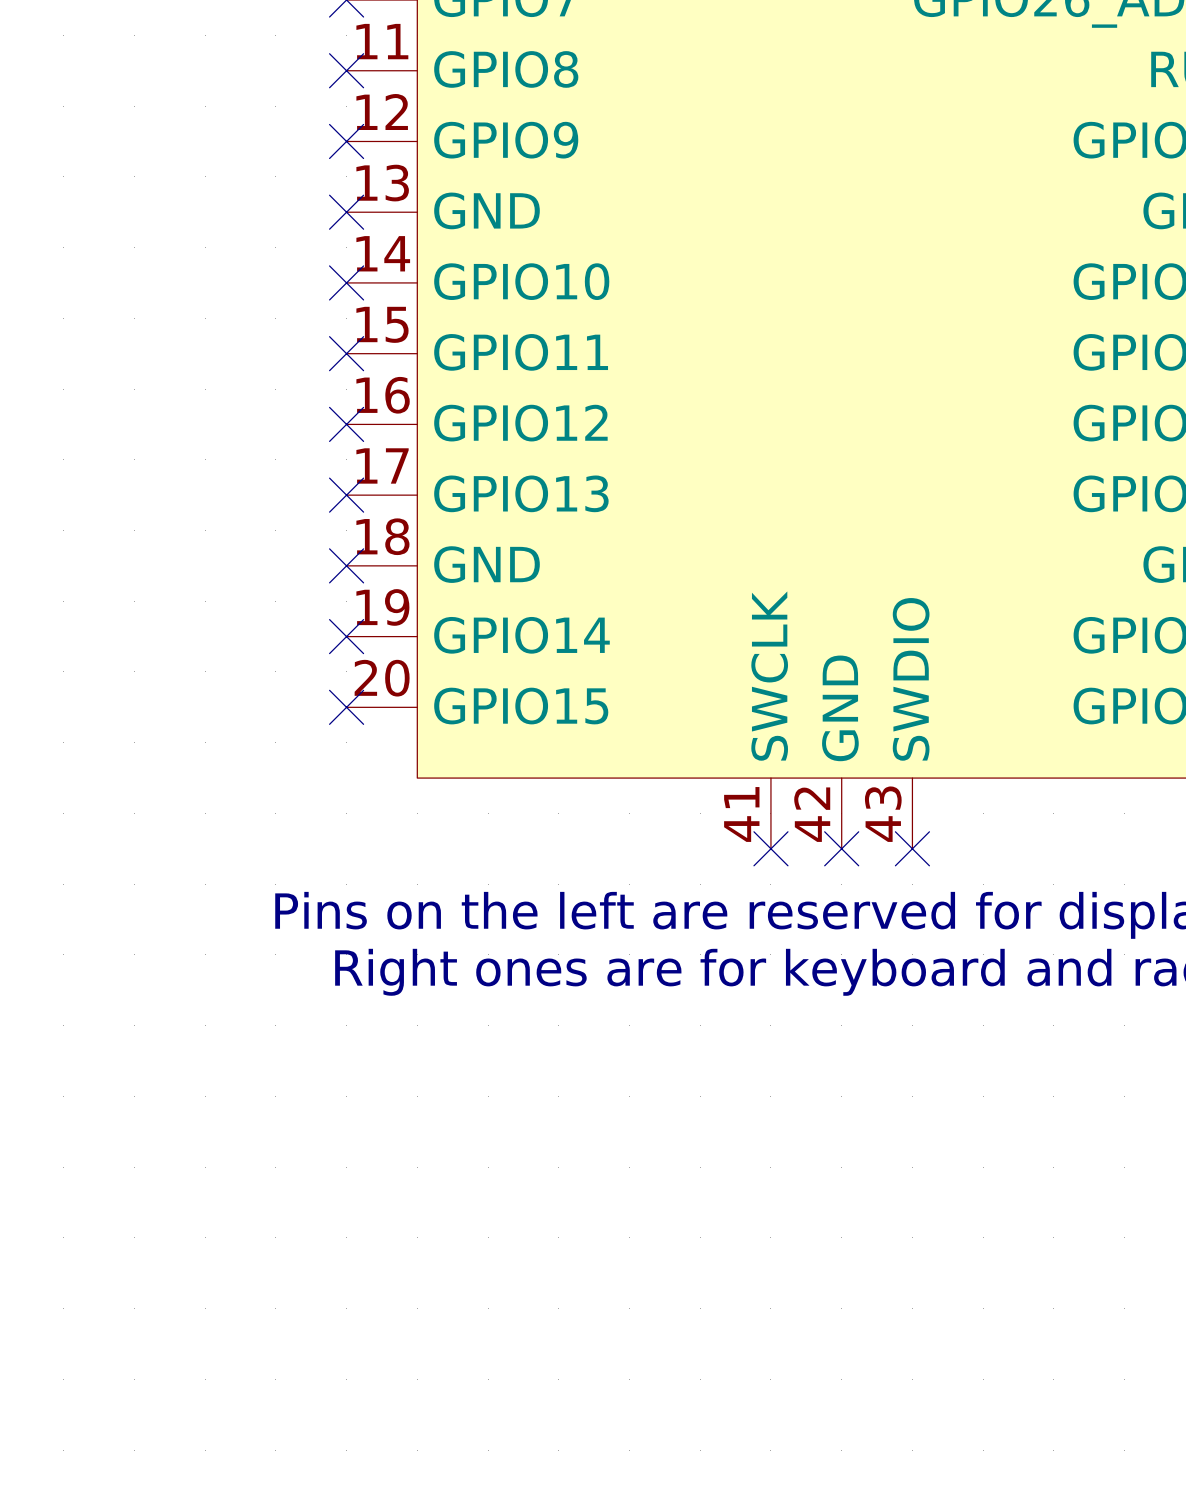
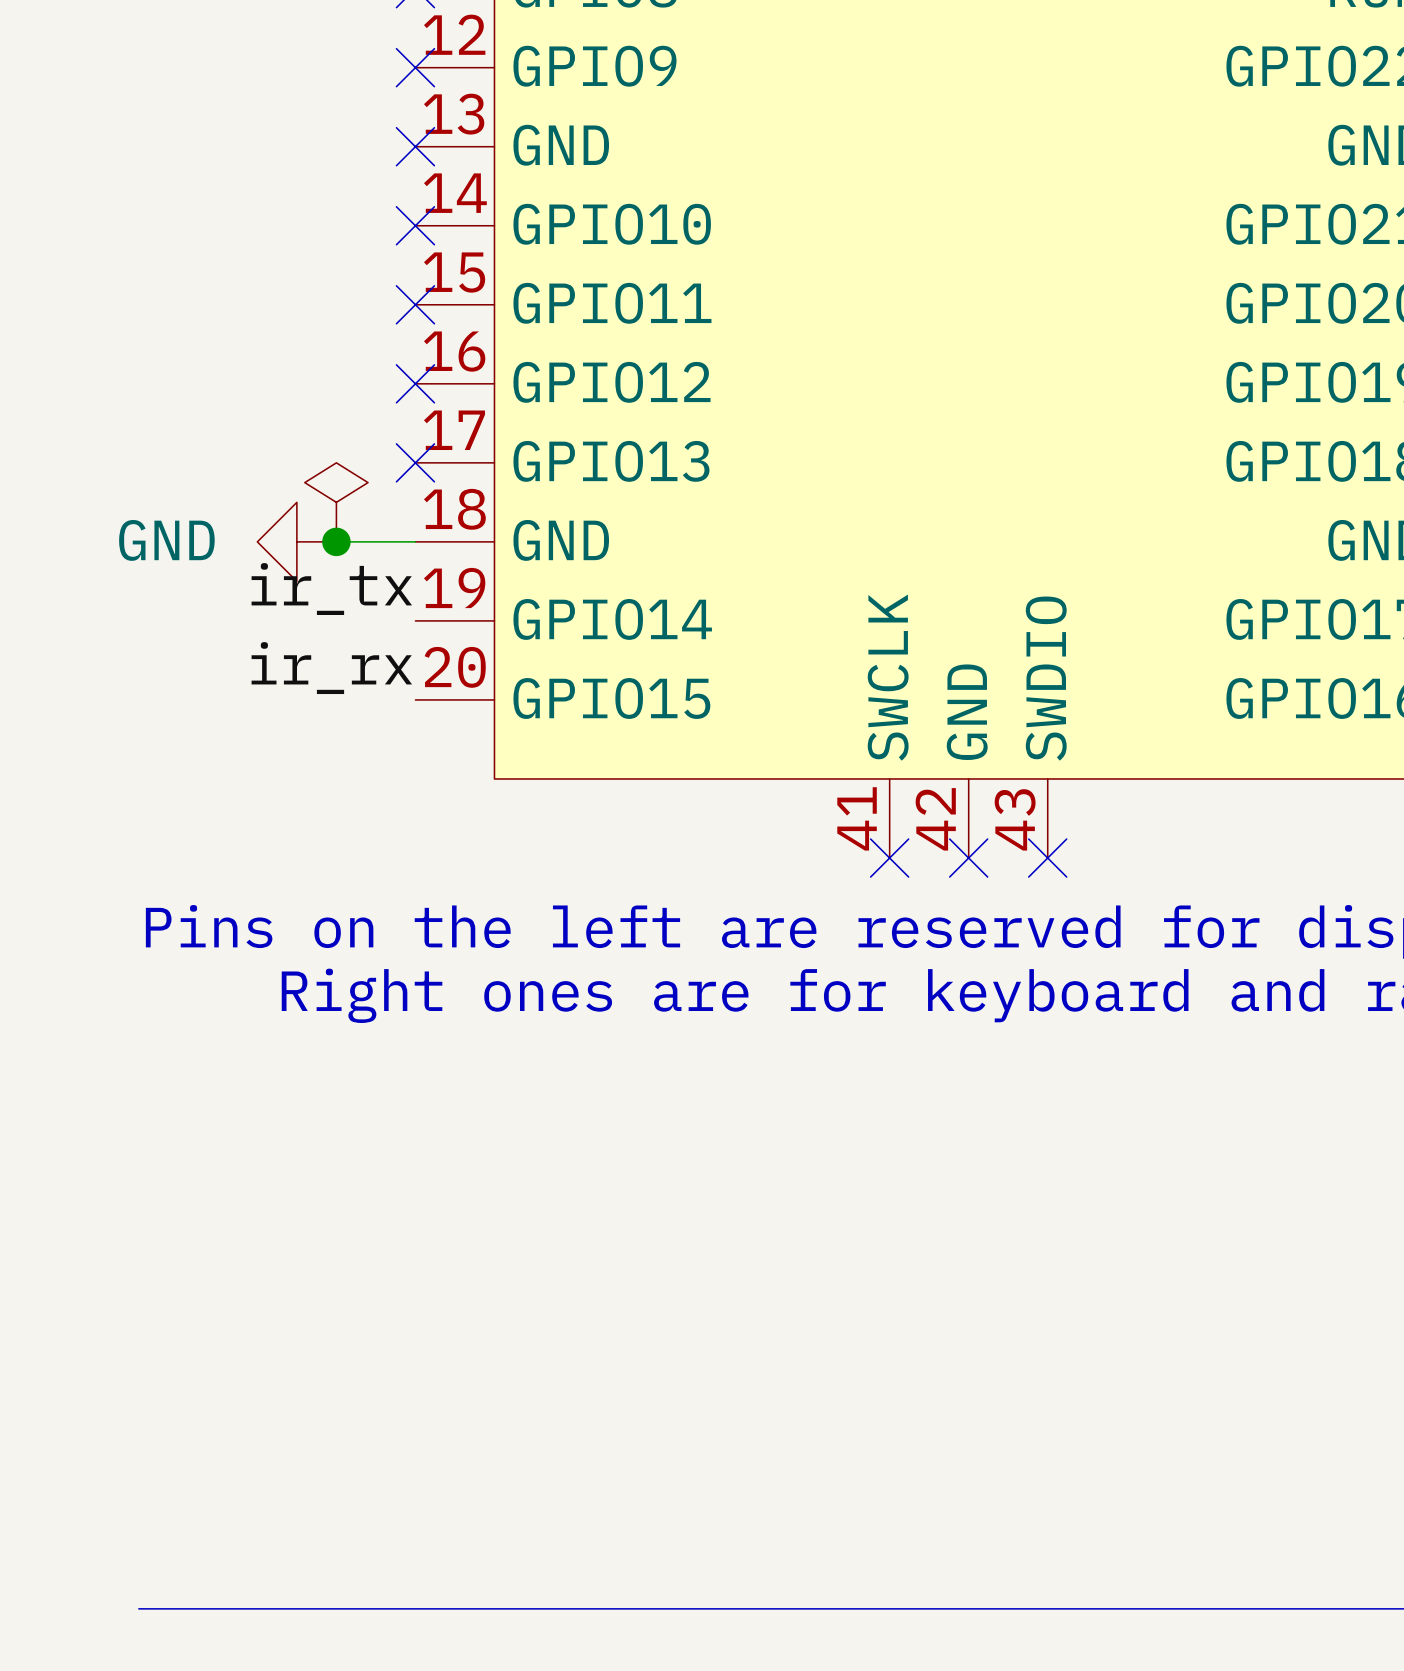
power symbol: none -> (336, 502)
power symbol: none -> GND (296, 541)
wire: none -> (336, 541) (415, 541)
junction: none -> (336, 541)
no-connect mark: (346, 565) -> none
label: none -> ir_tx (331, 589)
no-connect mark: (346, 636) -> none
label: none -> ir_rx (331, 668)
no-connect mark: (346, 707) -> none

